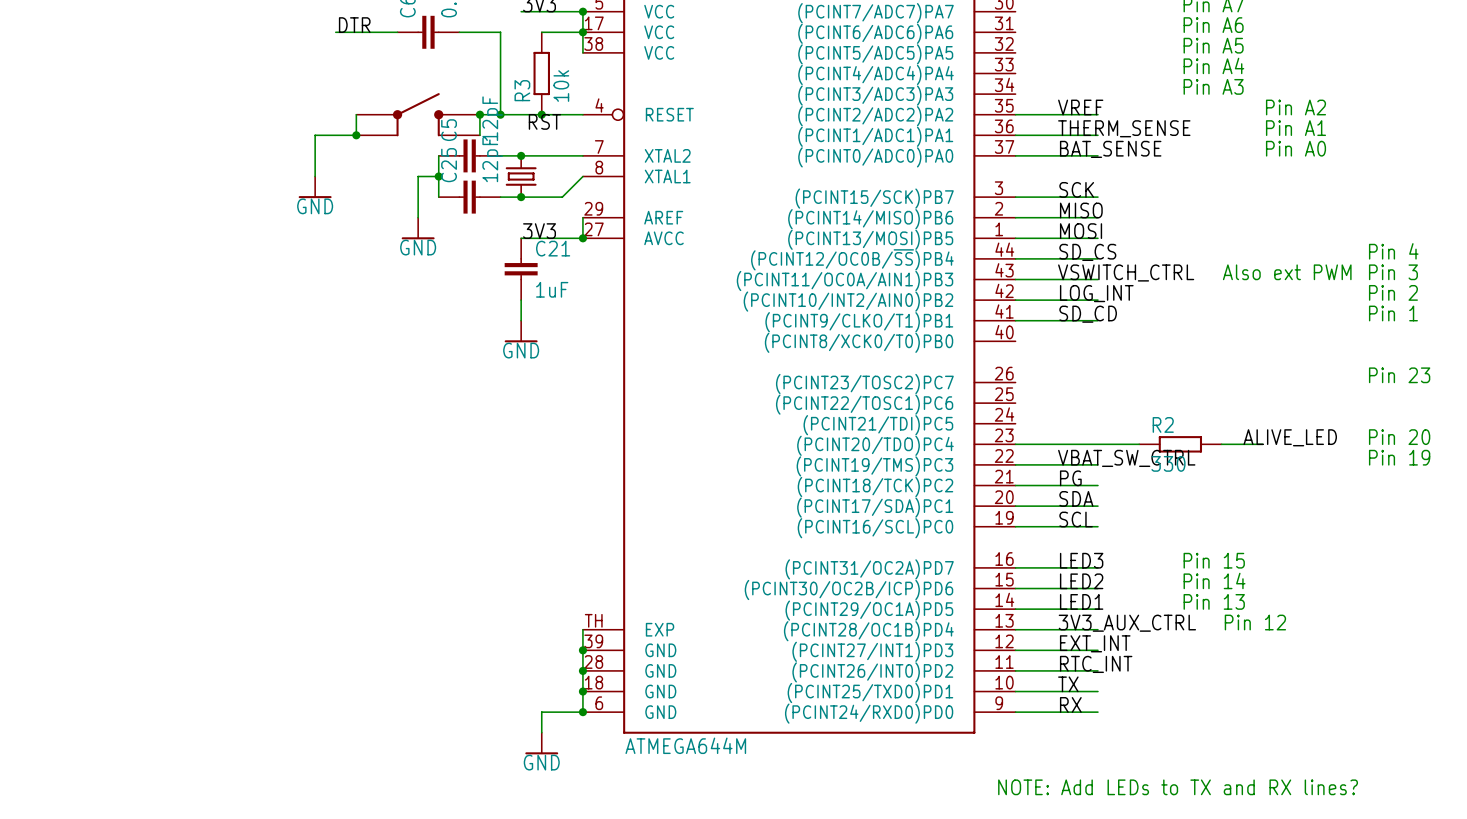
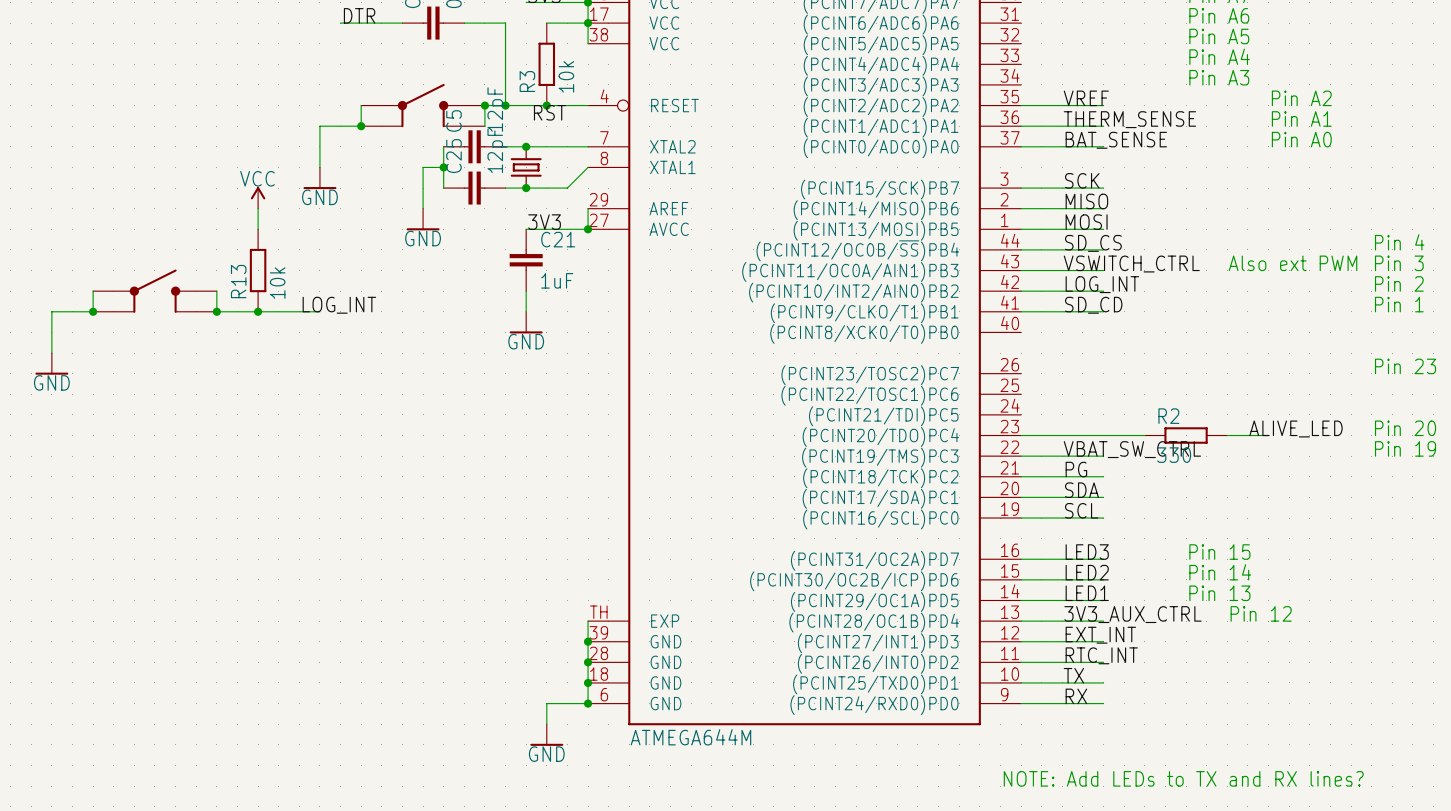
power symbol: none -> VCC (258, 197)
wire: none -> (258, 208) (258, 229)
R13: none -> 10k (258, 270)
wire: none -> (93, 291) (93, 311) (51, 311) (51, 353)
part: none -> (154, 291)
wire: none -> (216, 291) (216, 311) (319, 311)
label: none -> LOG_INT (339, 305)
junction: none -> (93, 311)
junction: none -> (216, 311)
junction: none -> (258, 311)
power symbol: none -> GND (51, 363)

